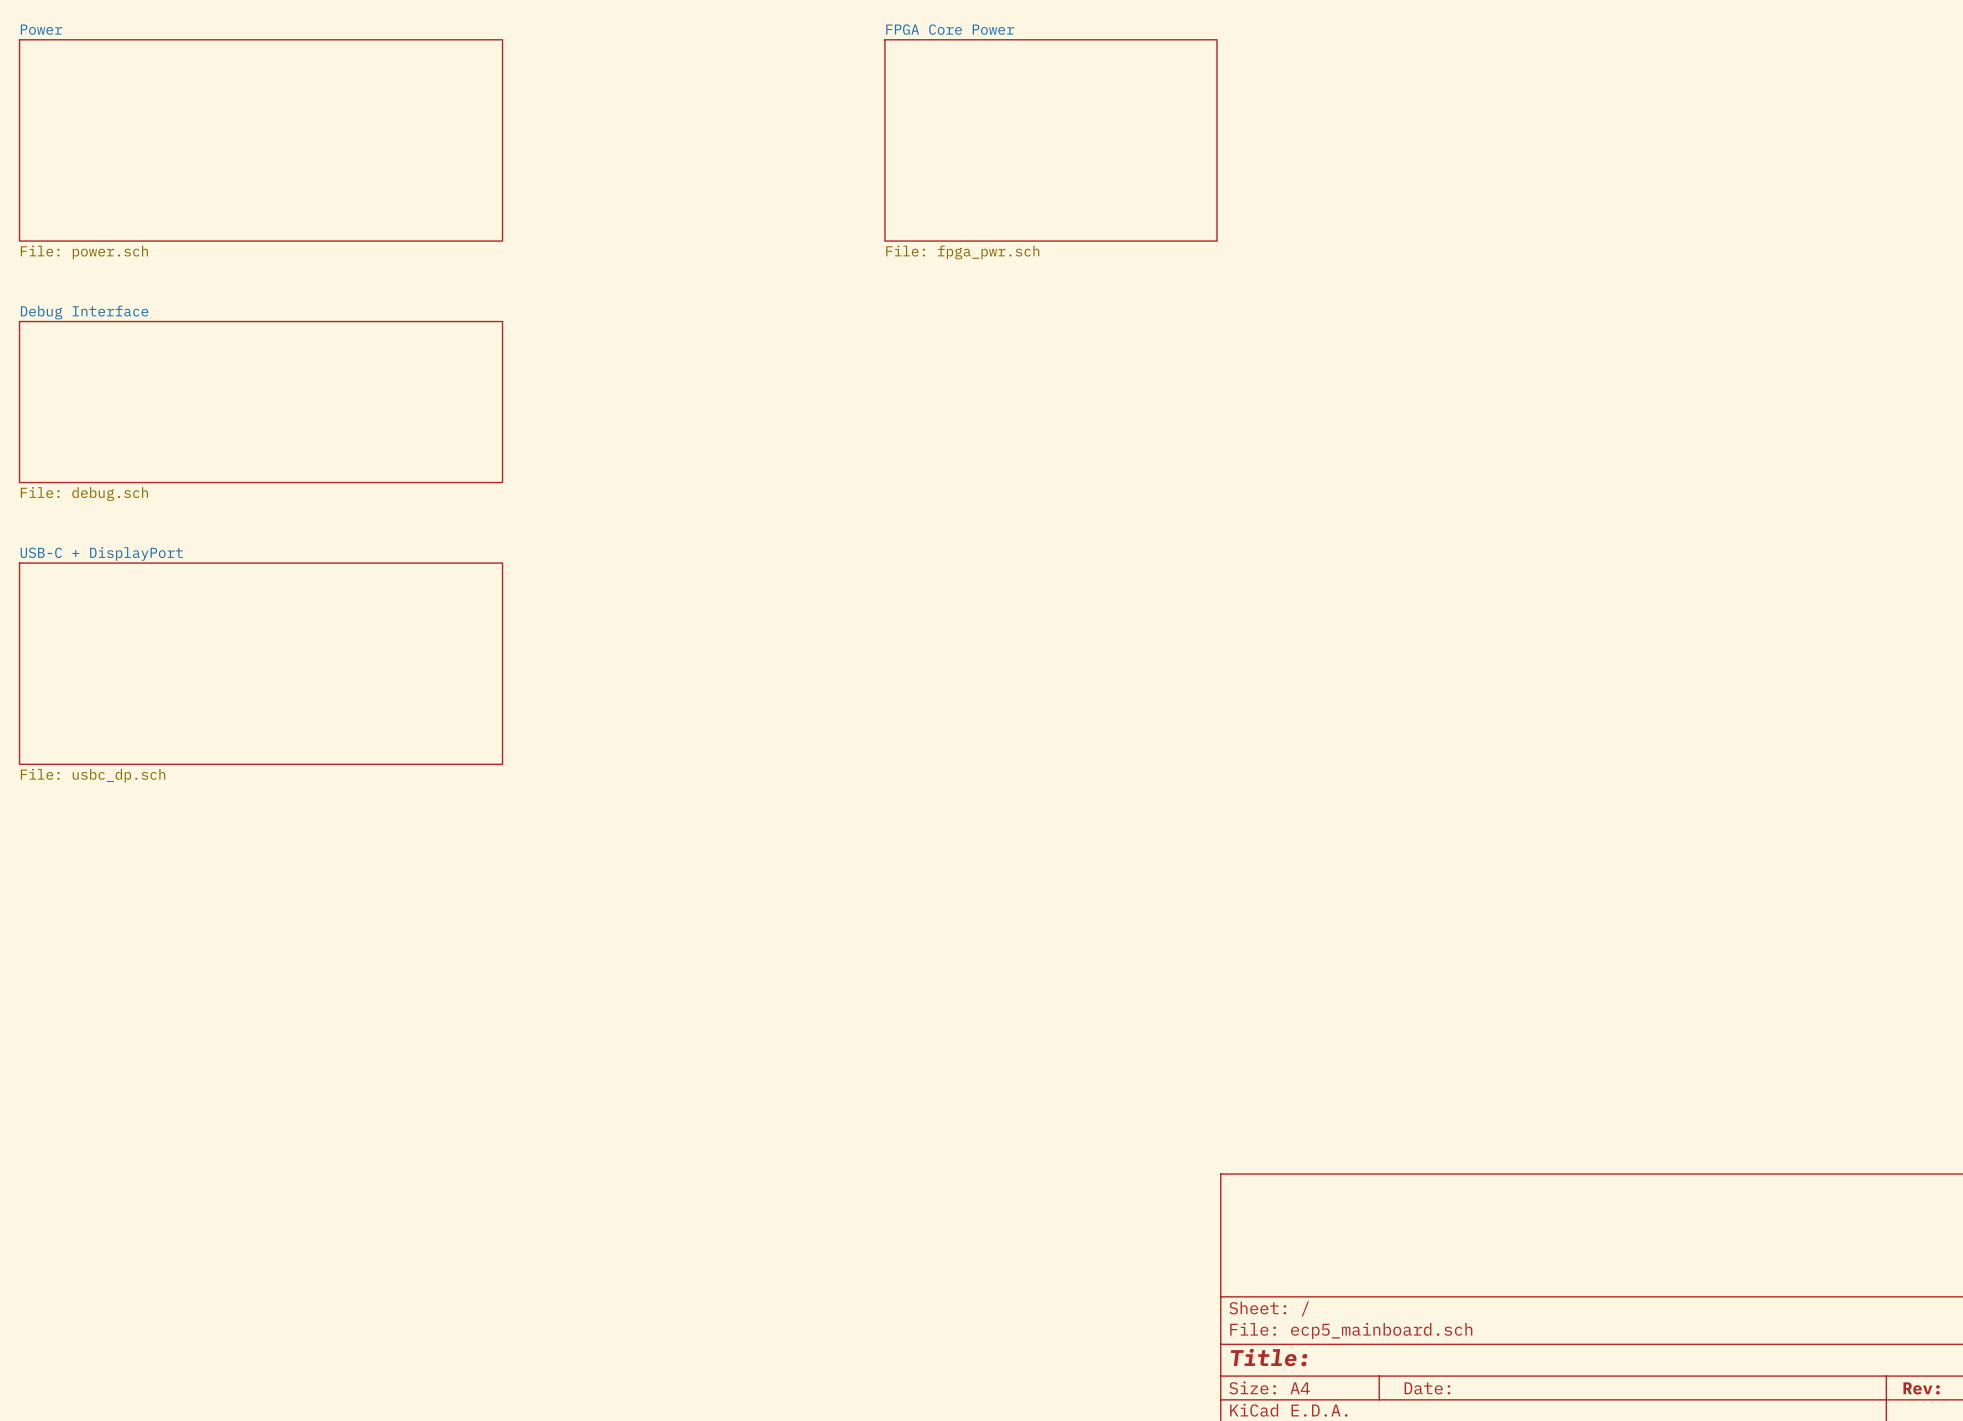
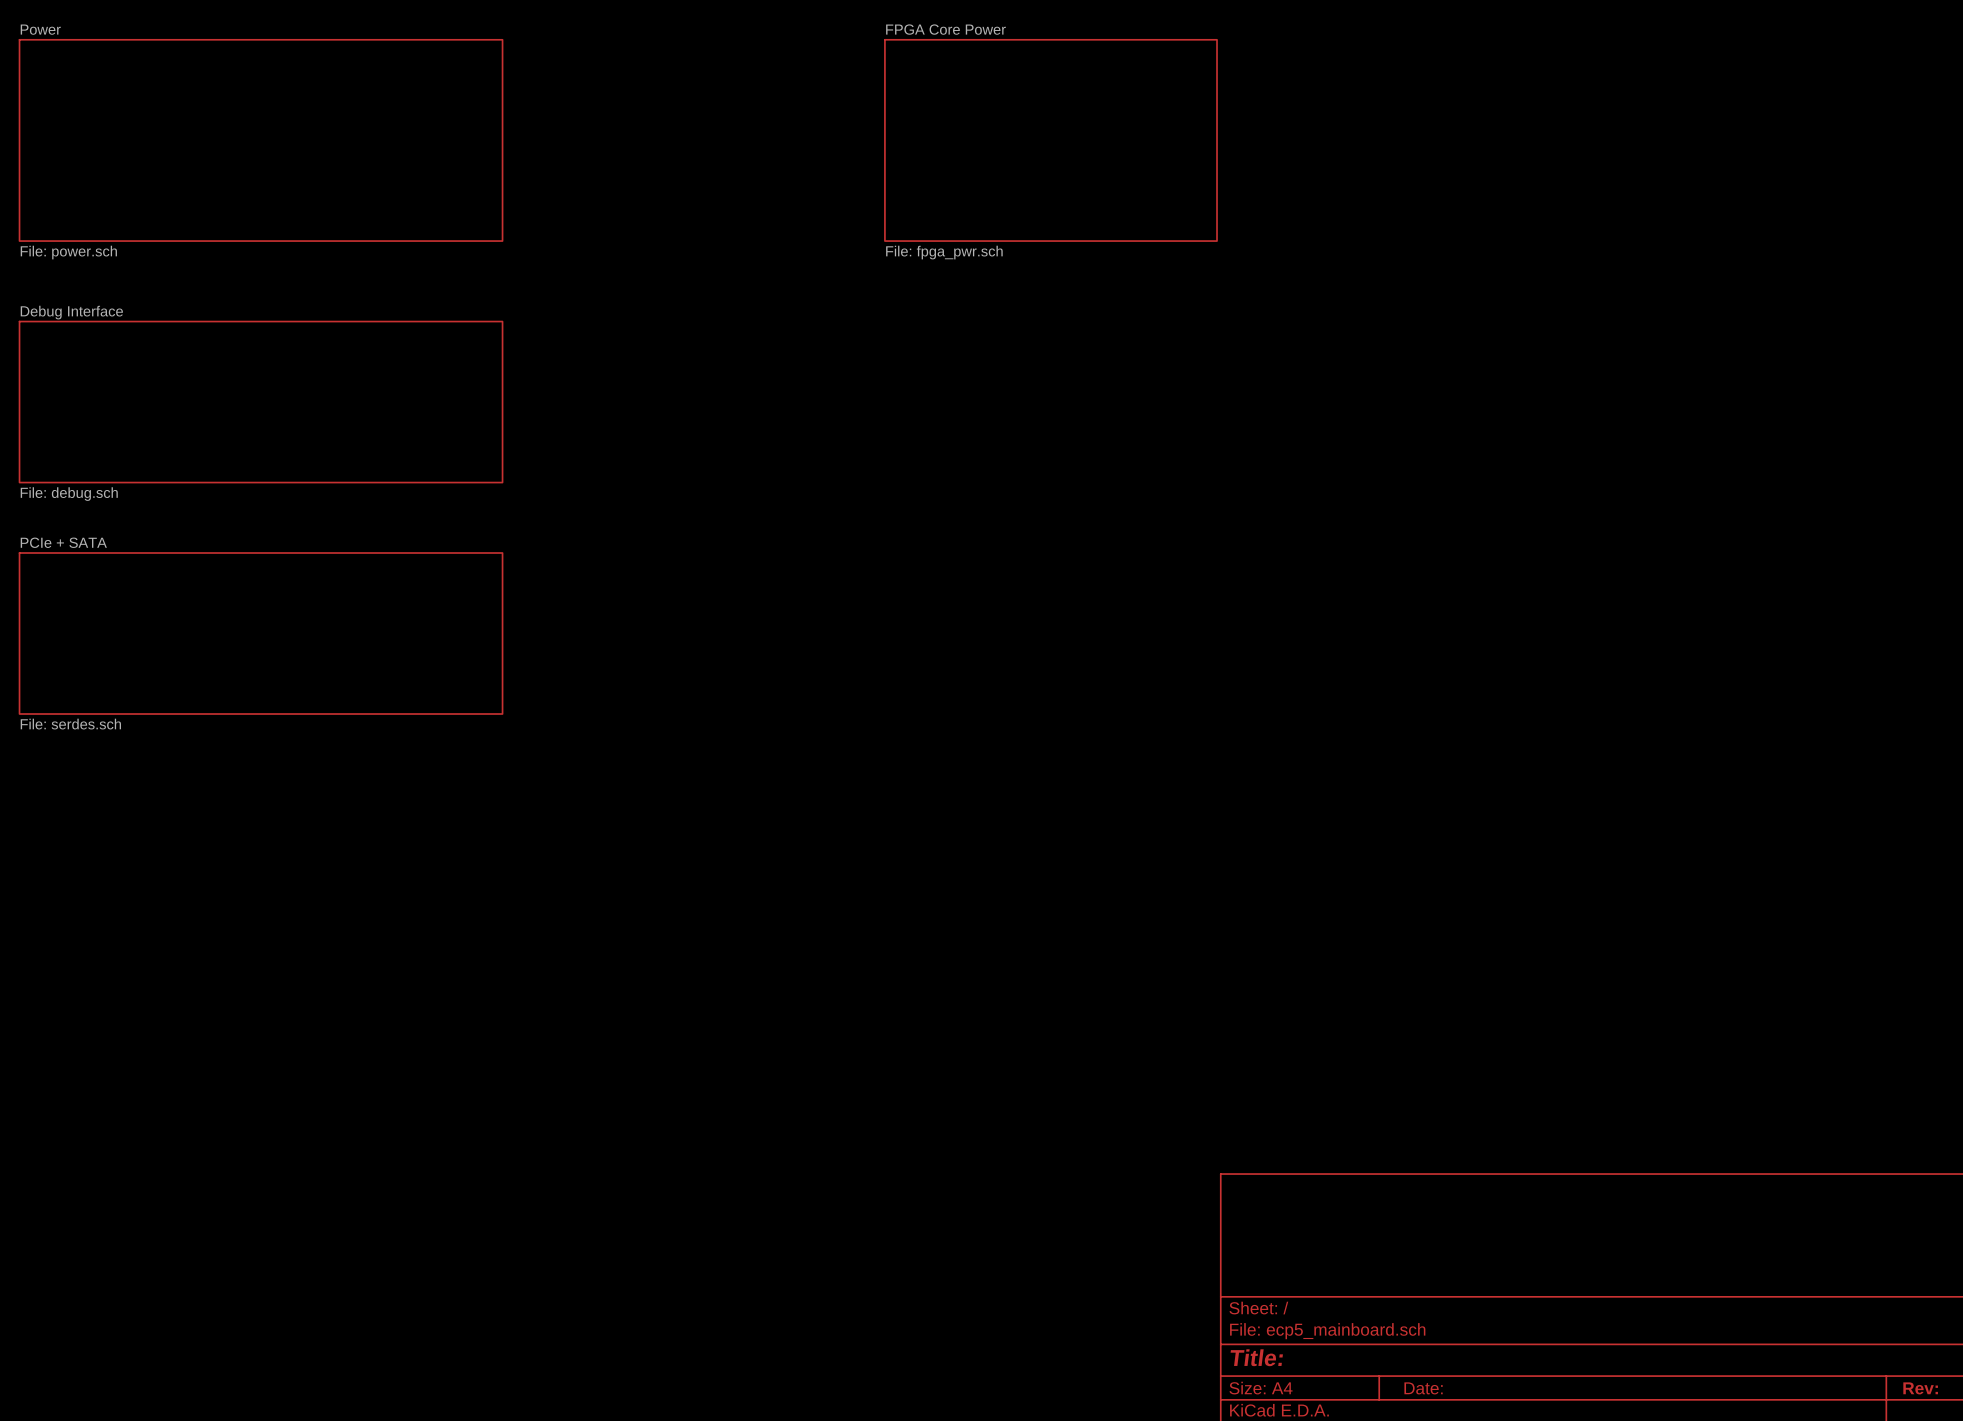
sheet PCIe + SATA: none -> File: serdes.sch (261, 633)
sheet USB-C + DisplayPort: File: usbc_dp.sch (261, 663) -> none

